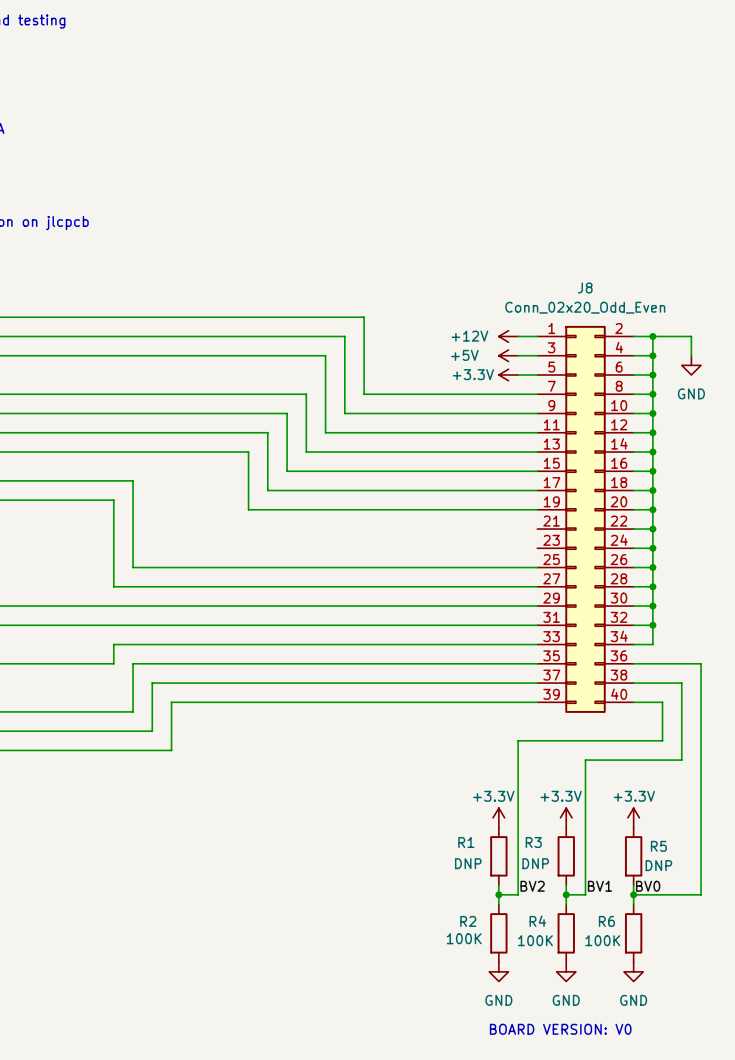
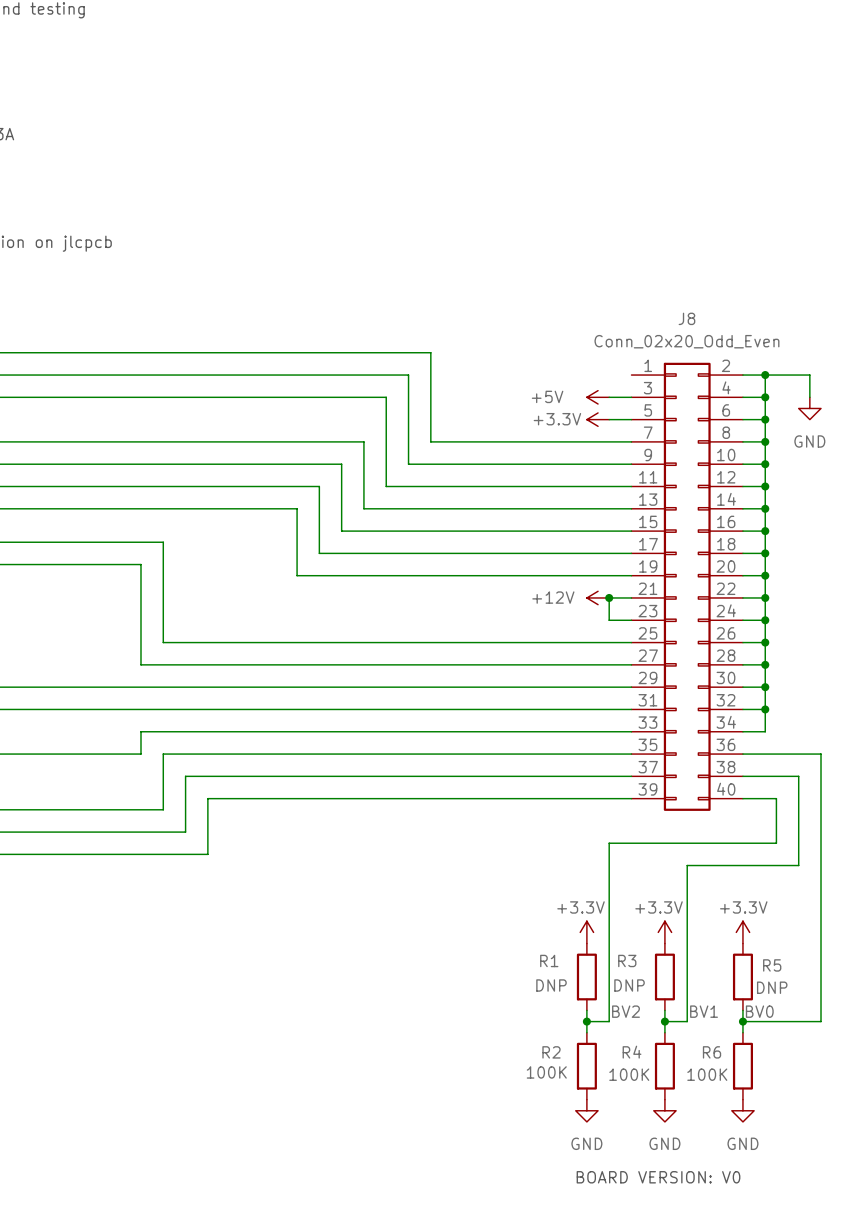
power symbol: +12V (508, 336) -> none
wire: (518, 336) (537, 336) -> none
power symbol: none -> +12V (598, 597)
junction: none -> (609, 597)
wire: none -> (631, 597) (609, 597) (609, 620) (631, 620)

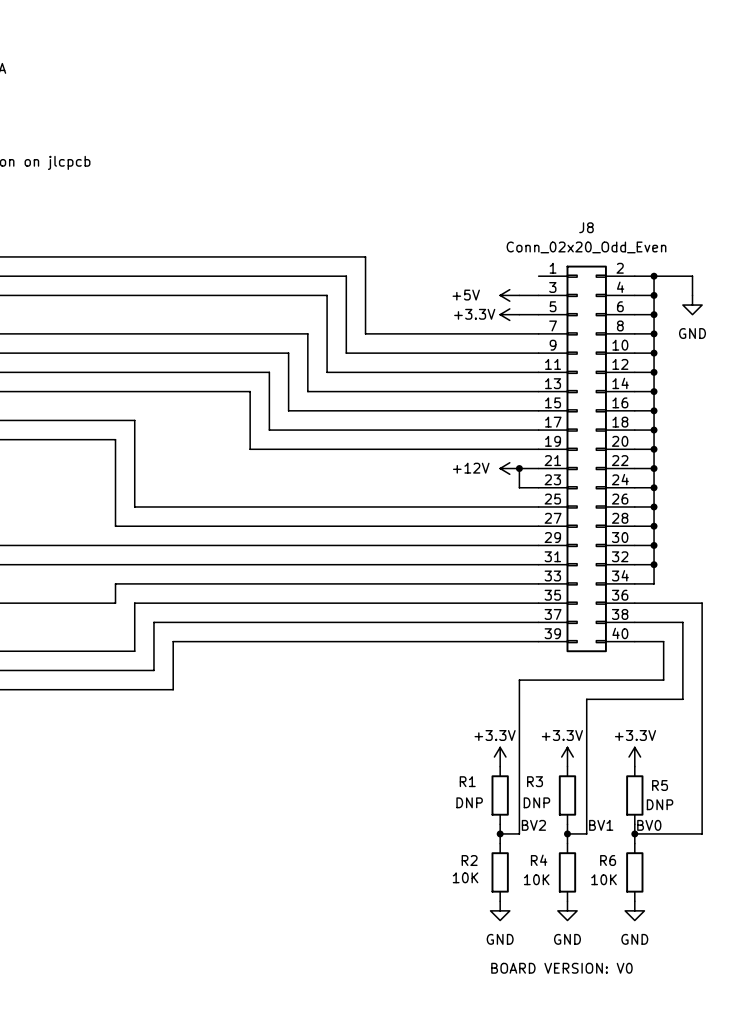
R2 value: 100K (546, 1072) -> 10K (465, 877)
R4 value: 100K (629, 1074) -> 10K (536, 879)
R6 value: 100K (707, 1074) -> 10K (604, 879)

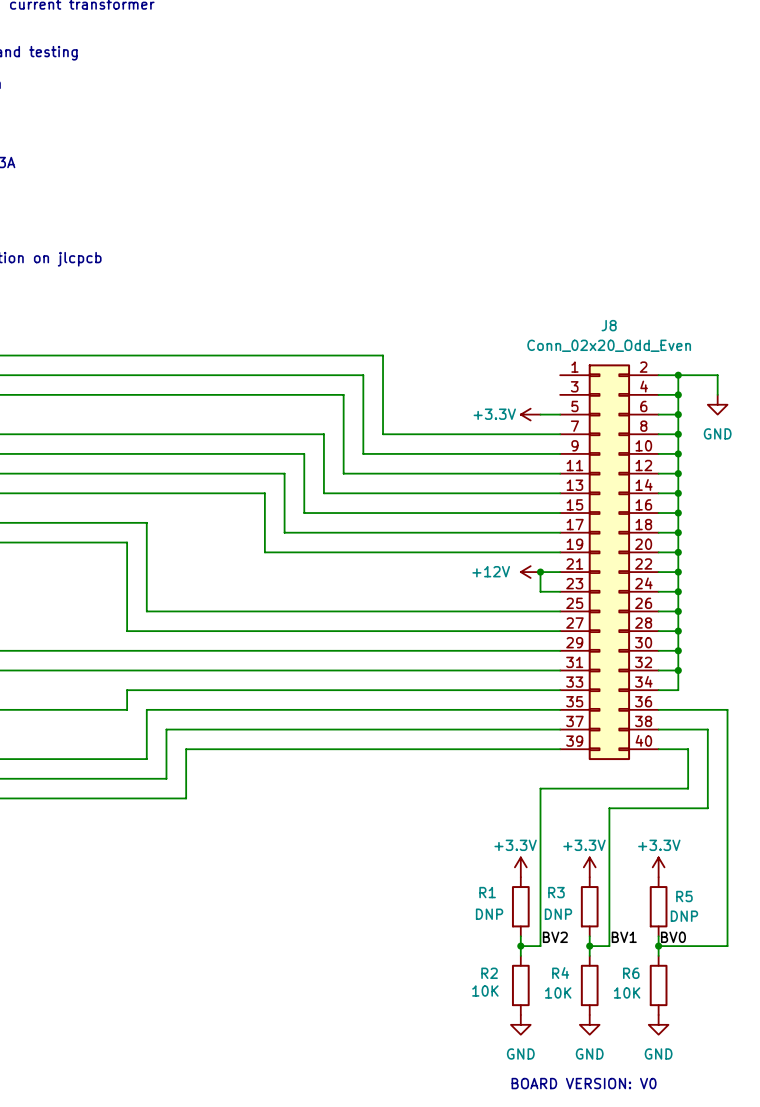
power symbol: +5V (509, 295) -> none
wire: (519, 295) (538, 295) -> none

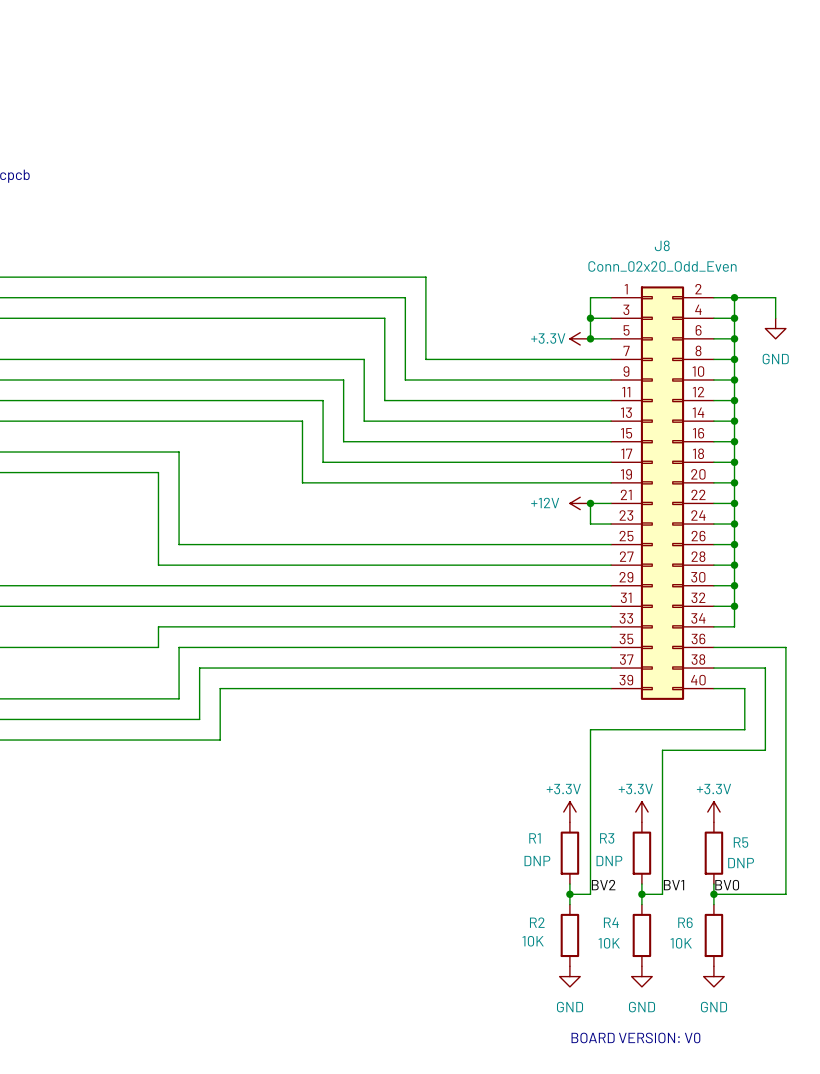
wire: none -> (611, 297) (590, 297) (590, 338)
wire: none -> (590, 318) (611, 318)
junction: none -> (590, 318)
junction: none -> (590, 338)

